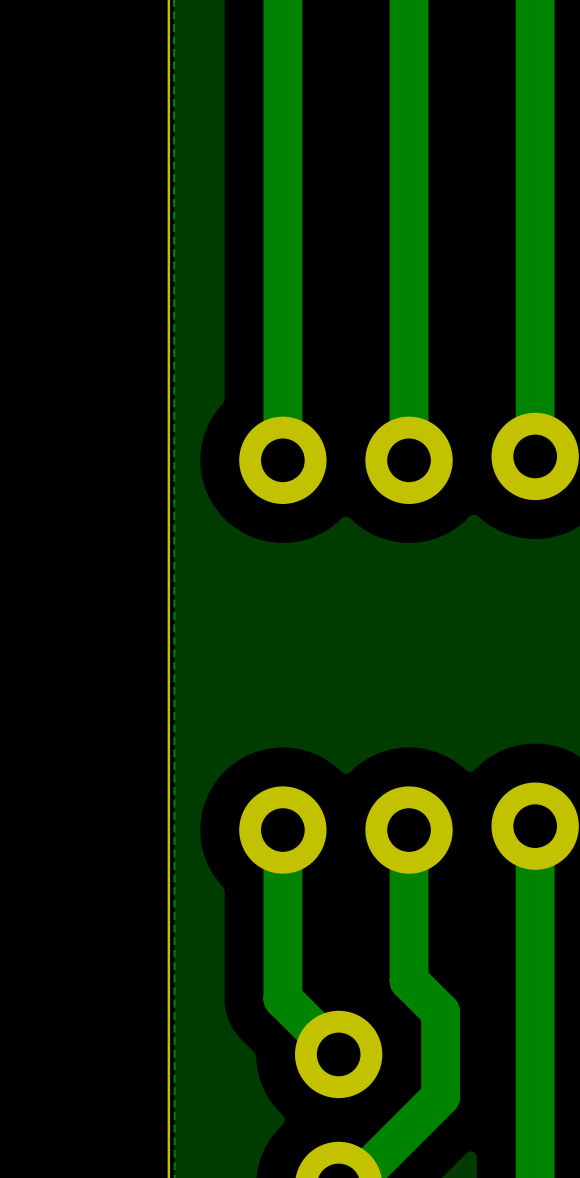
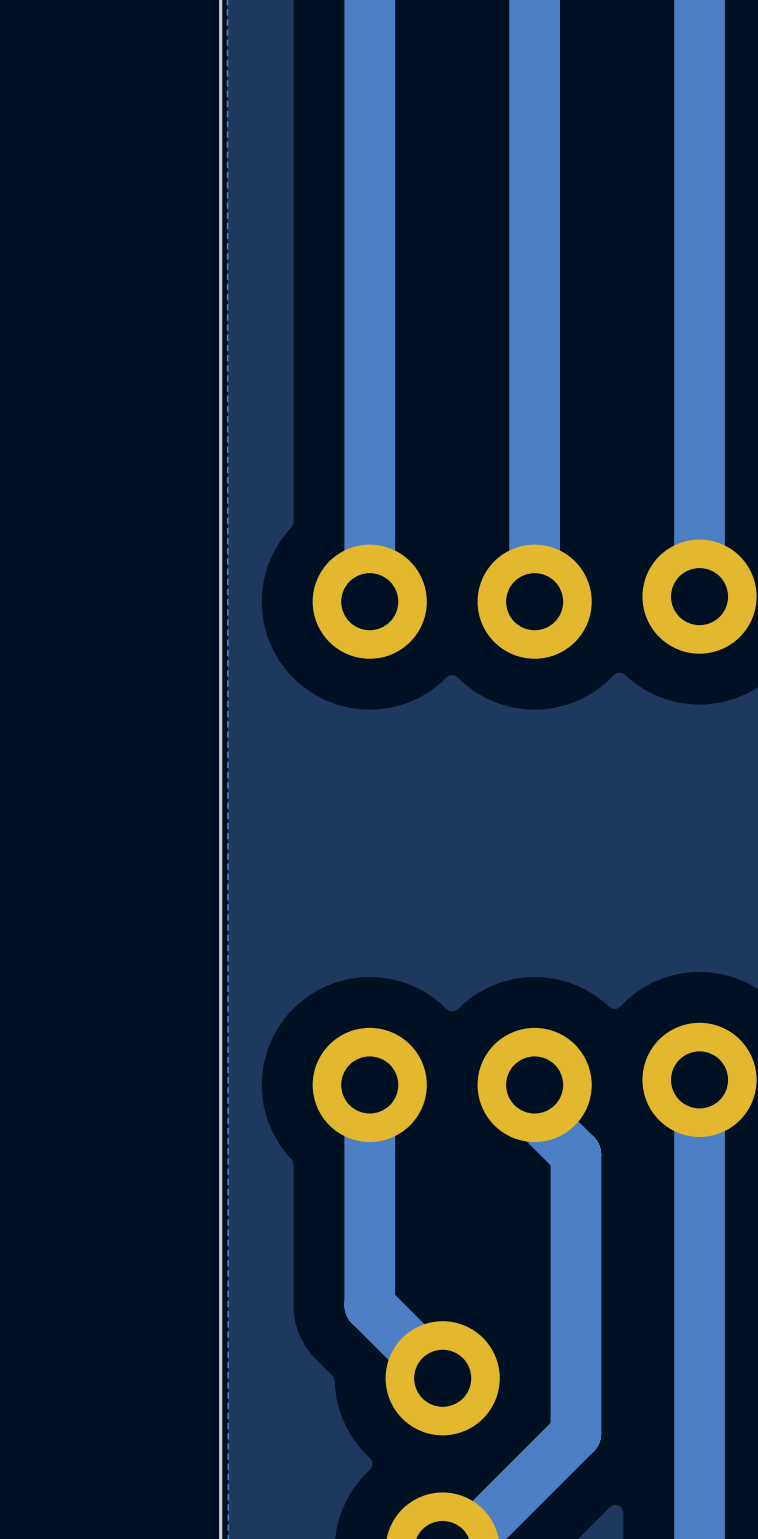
track: (409, 851) (409, 980) (440, 1012) -> (534, 1113) (575, 1154) (575, 1323)

